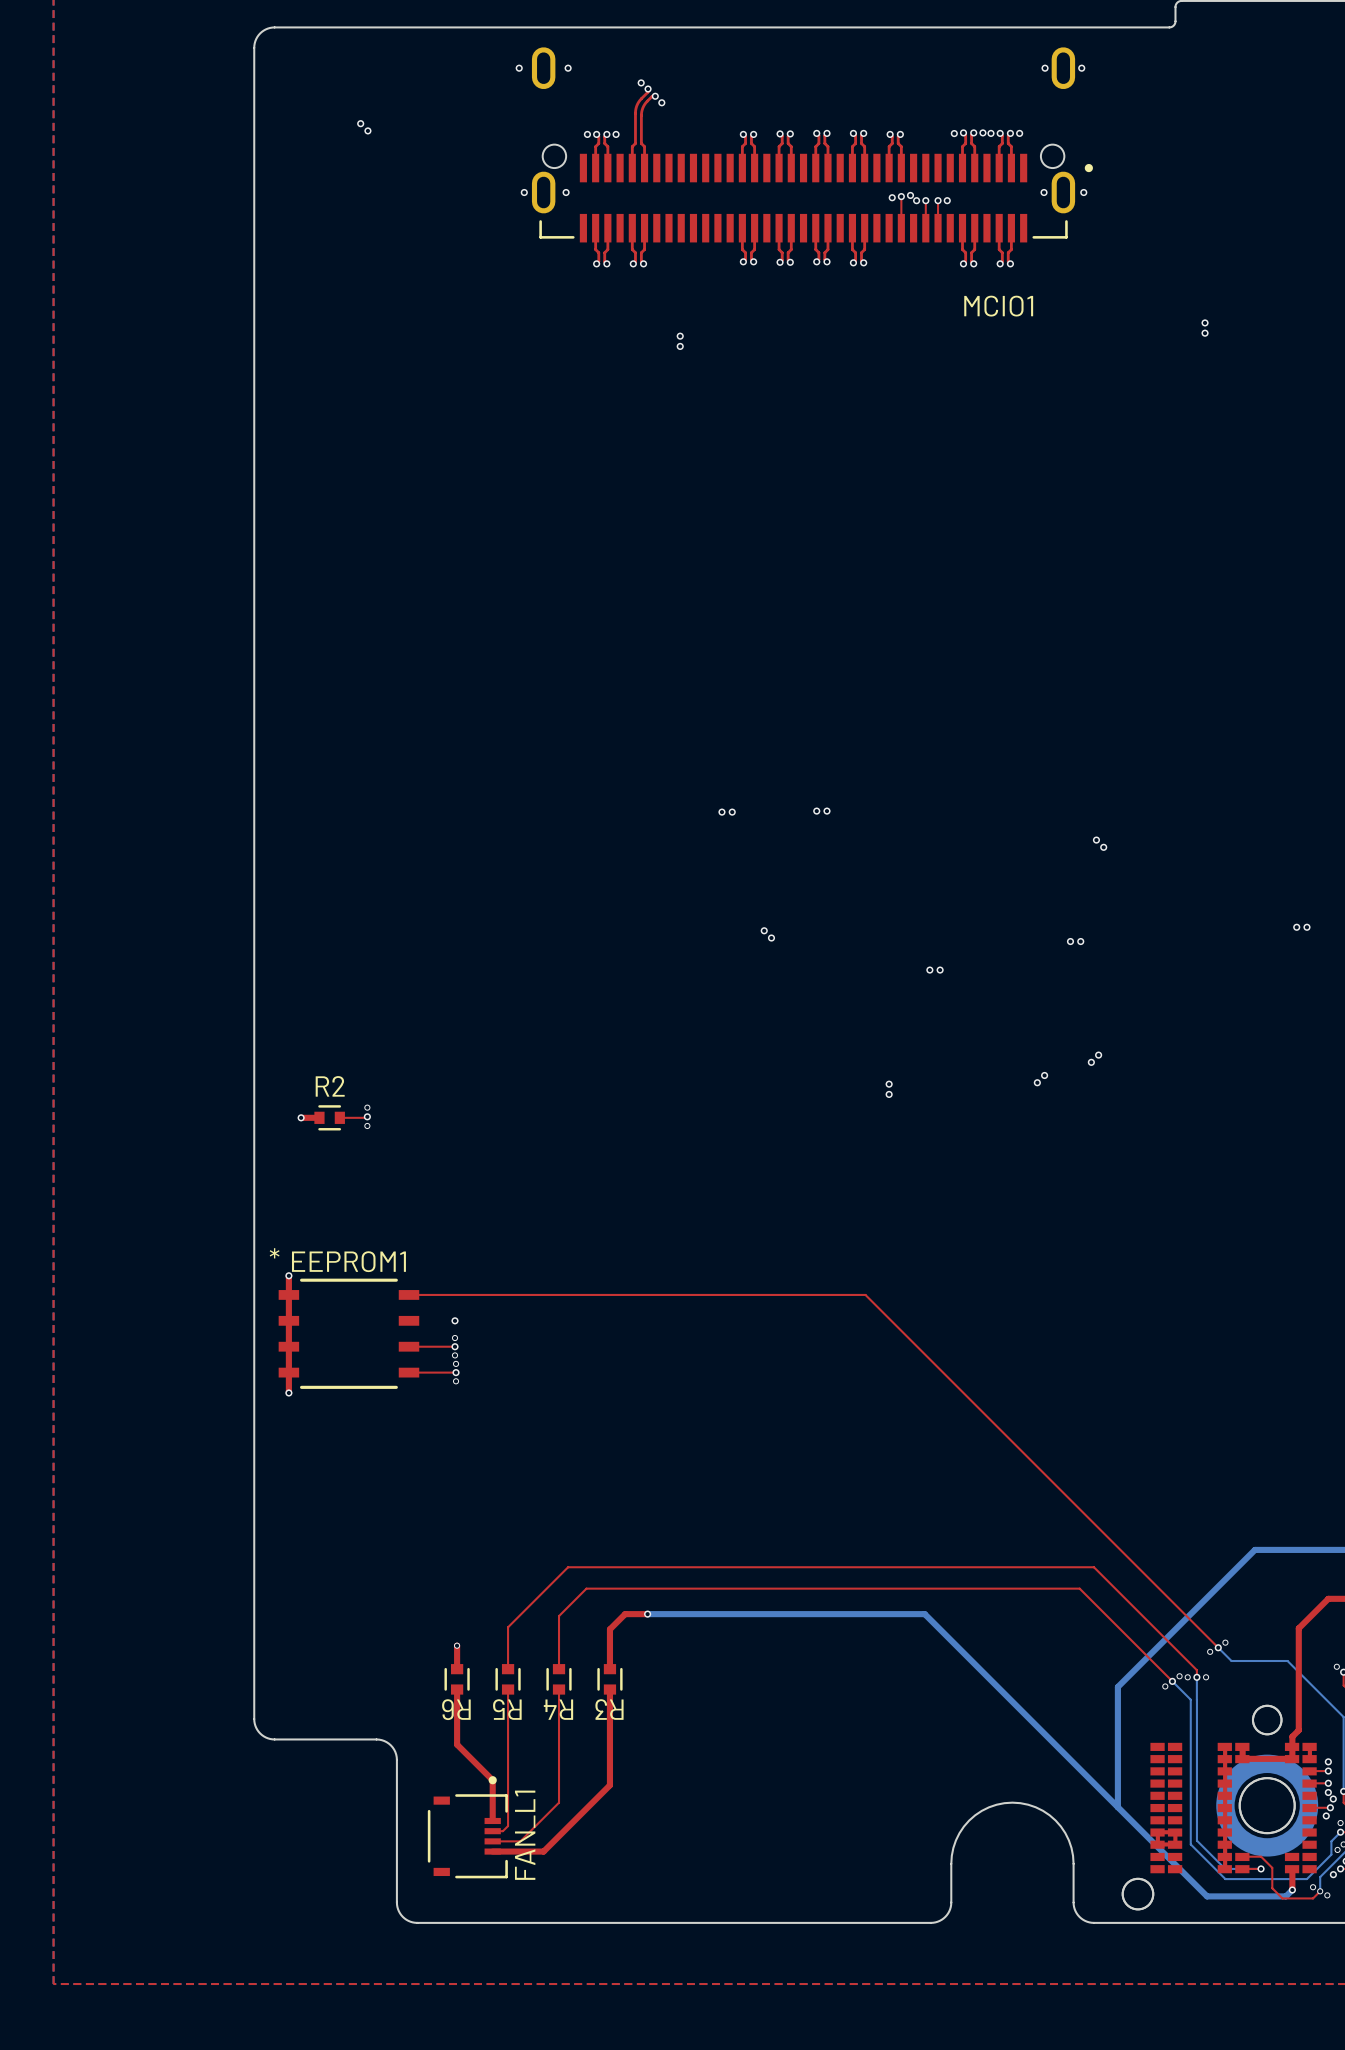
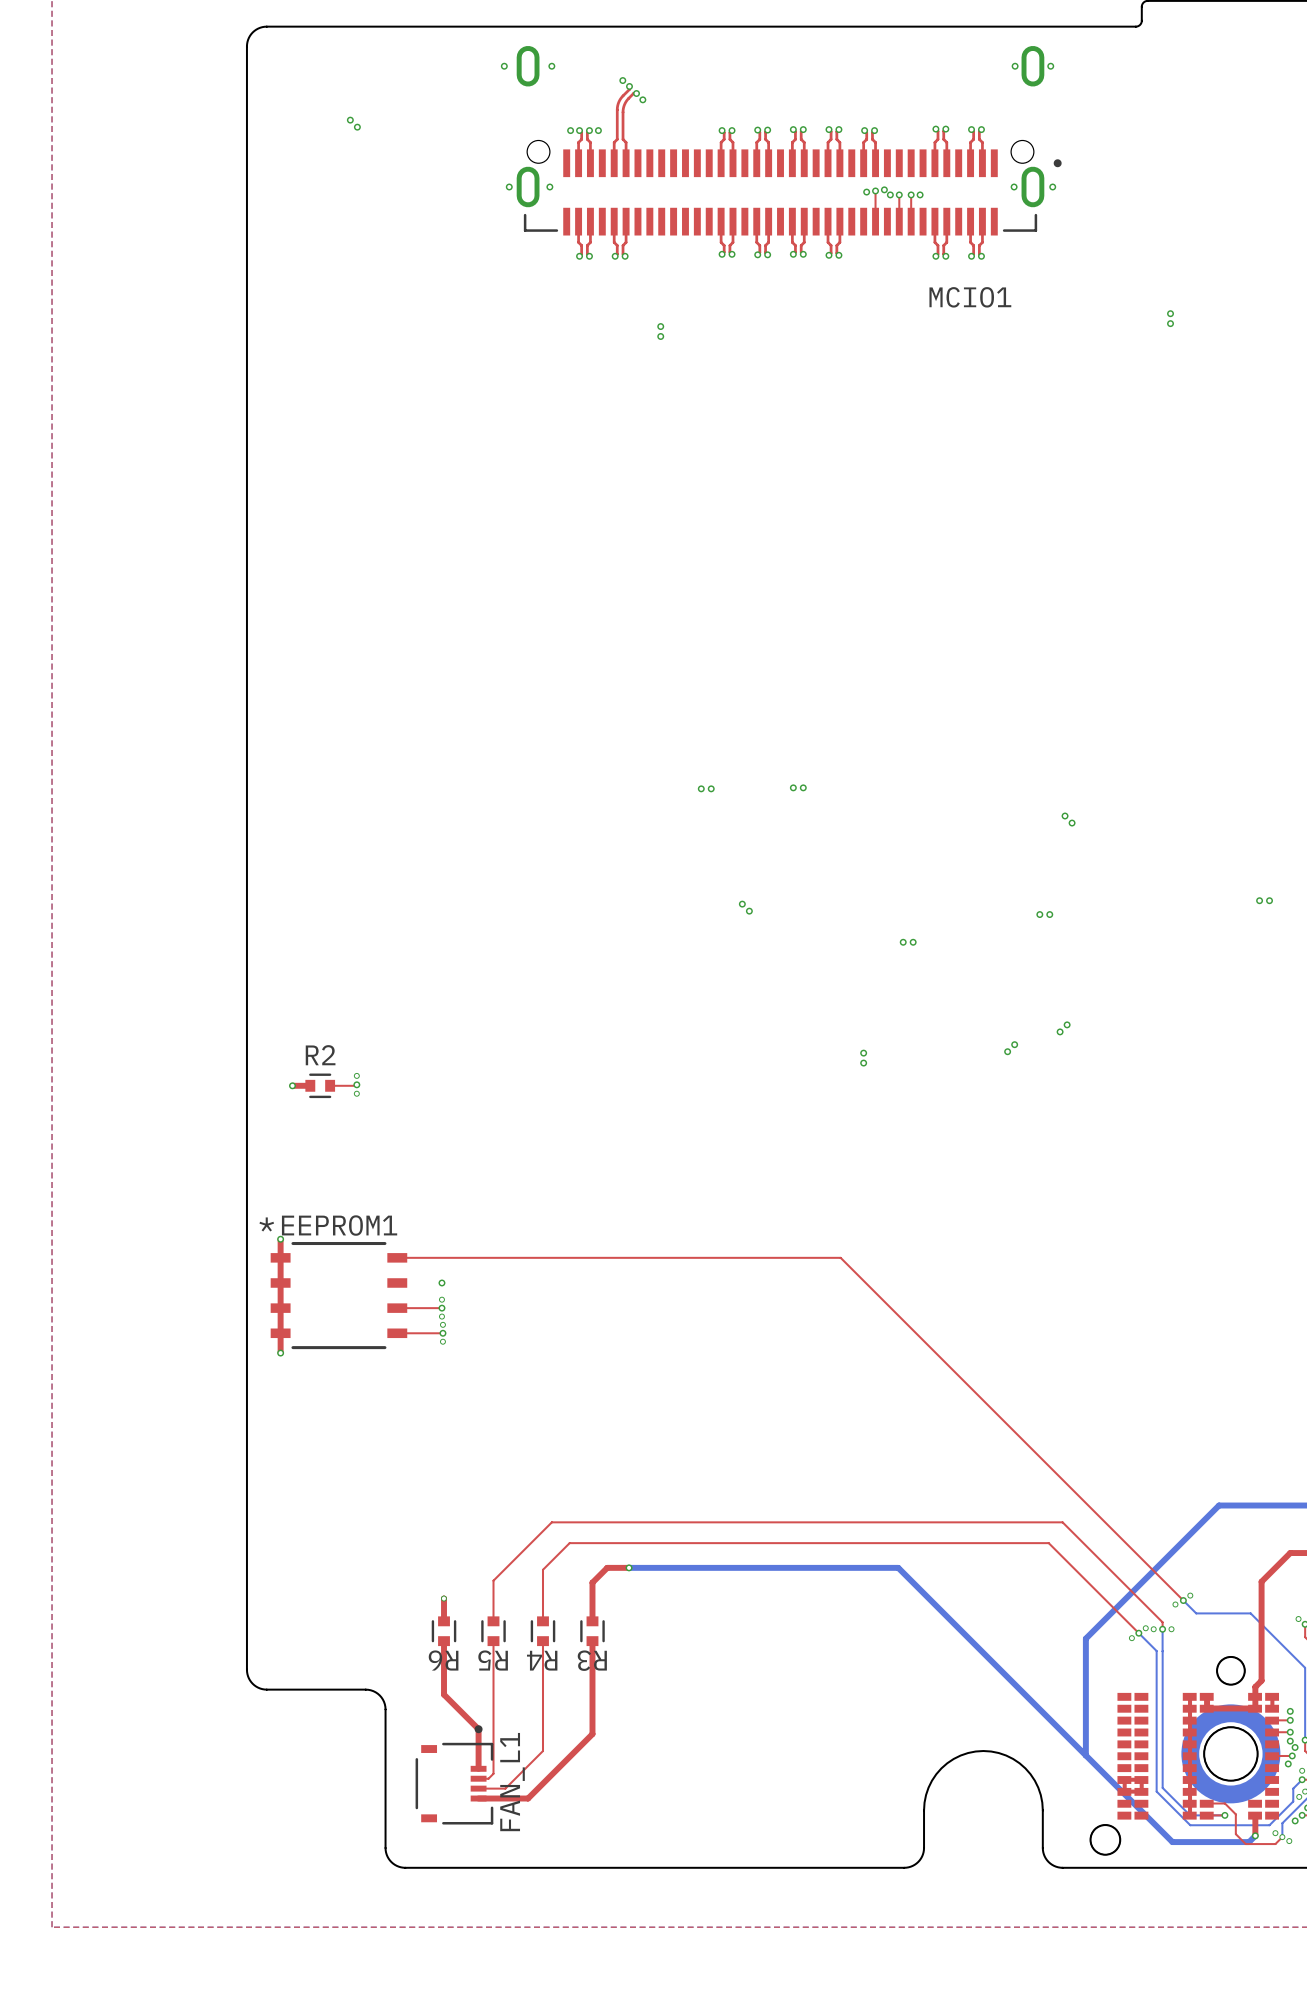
via: (982, 132) -> none
via: (954, 133) -> none
via: (990, 133) -> none
via: (1019, 133) -> none

